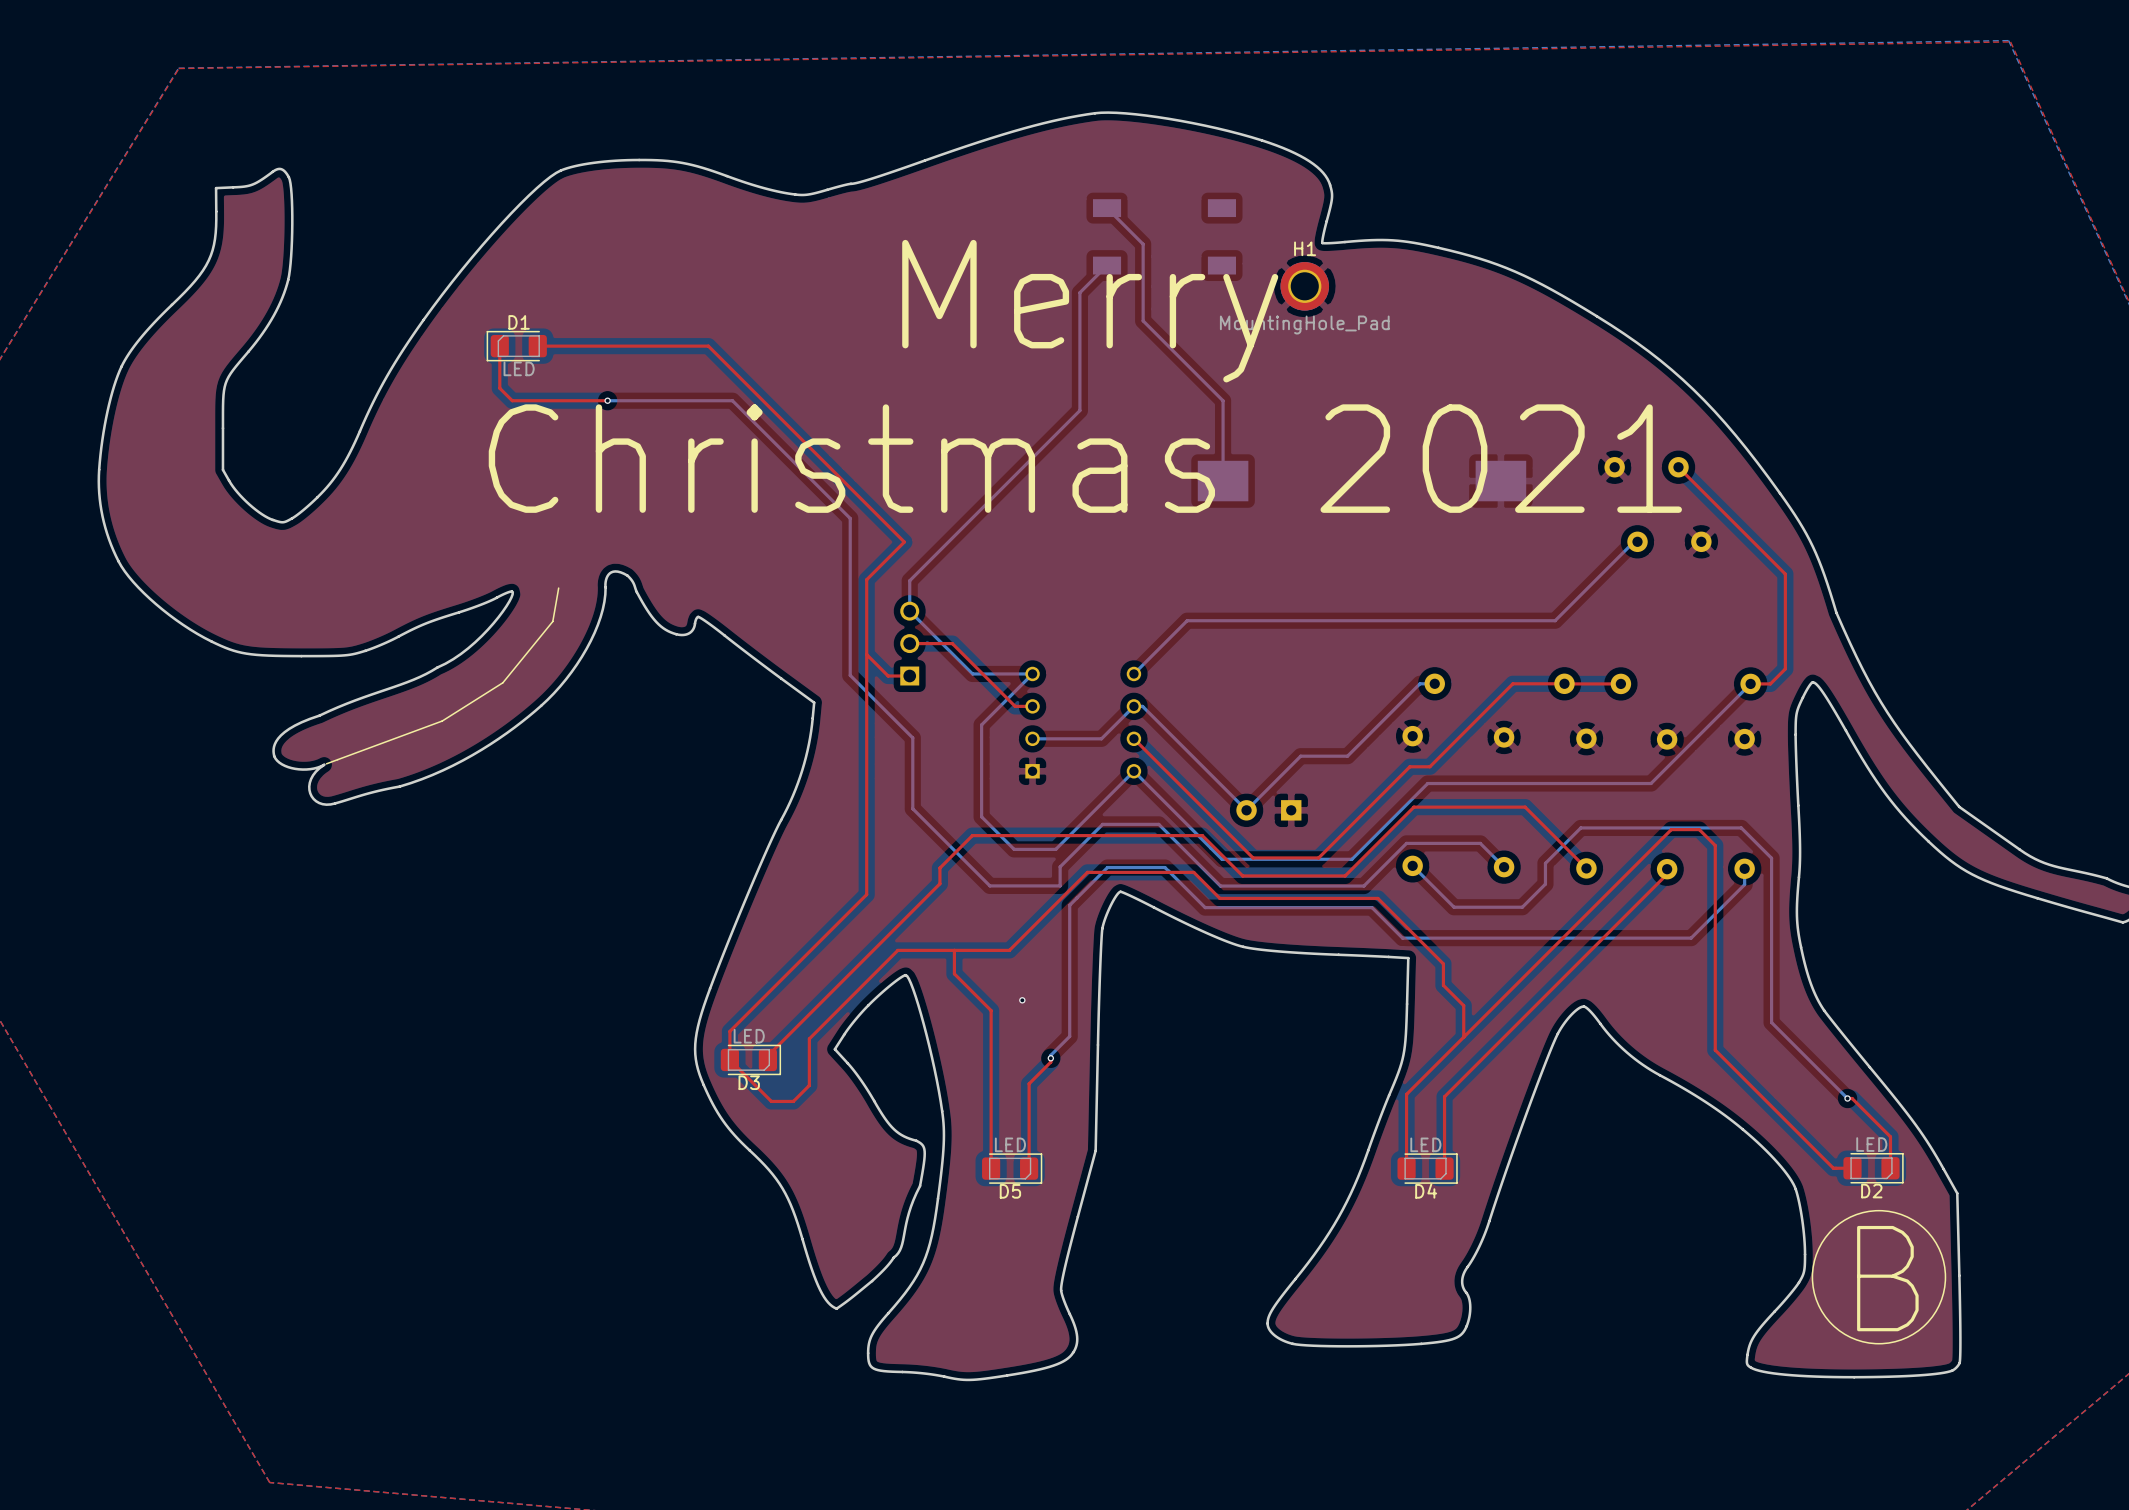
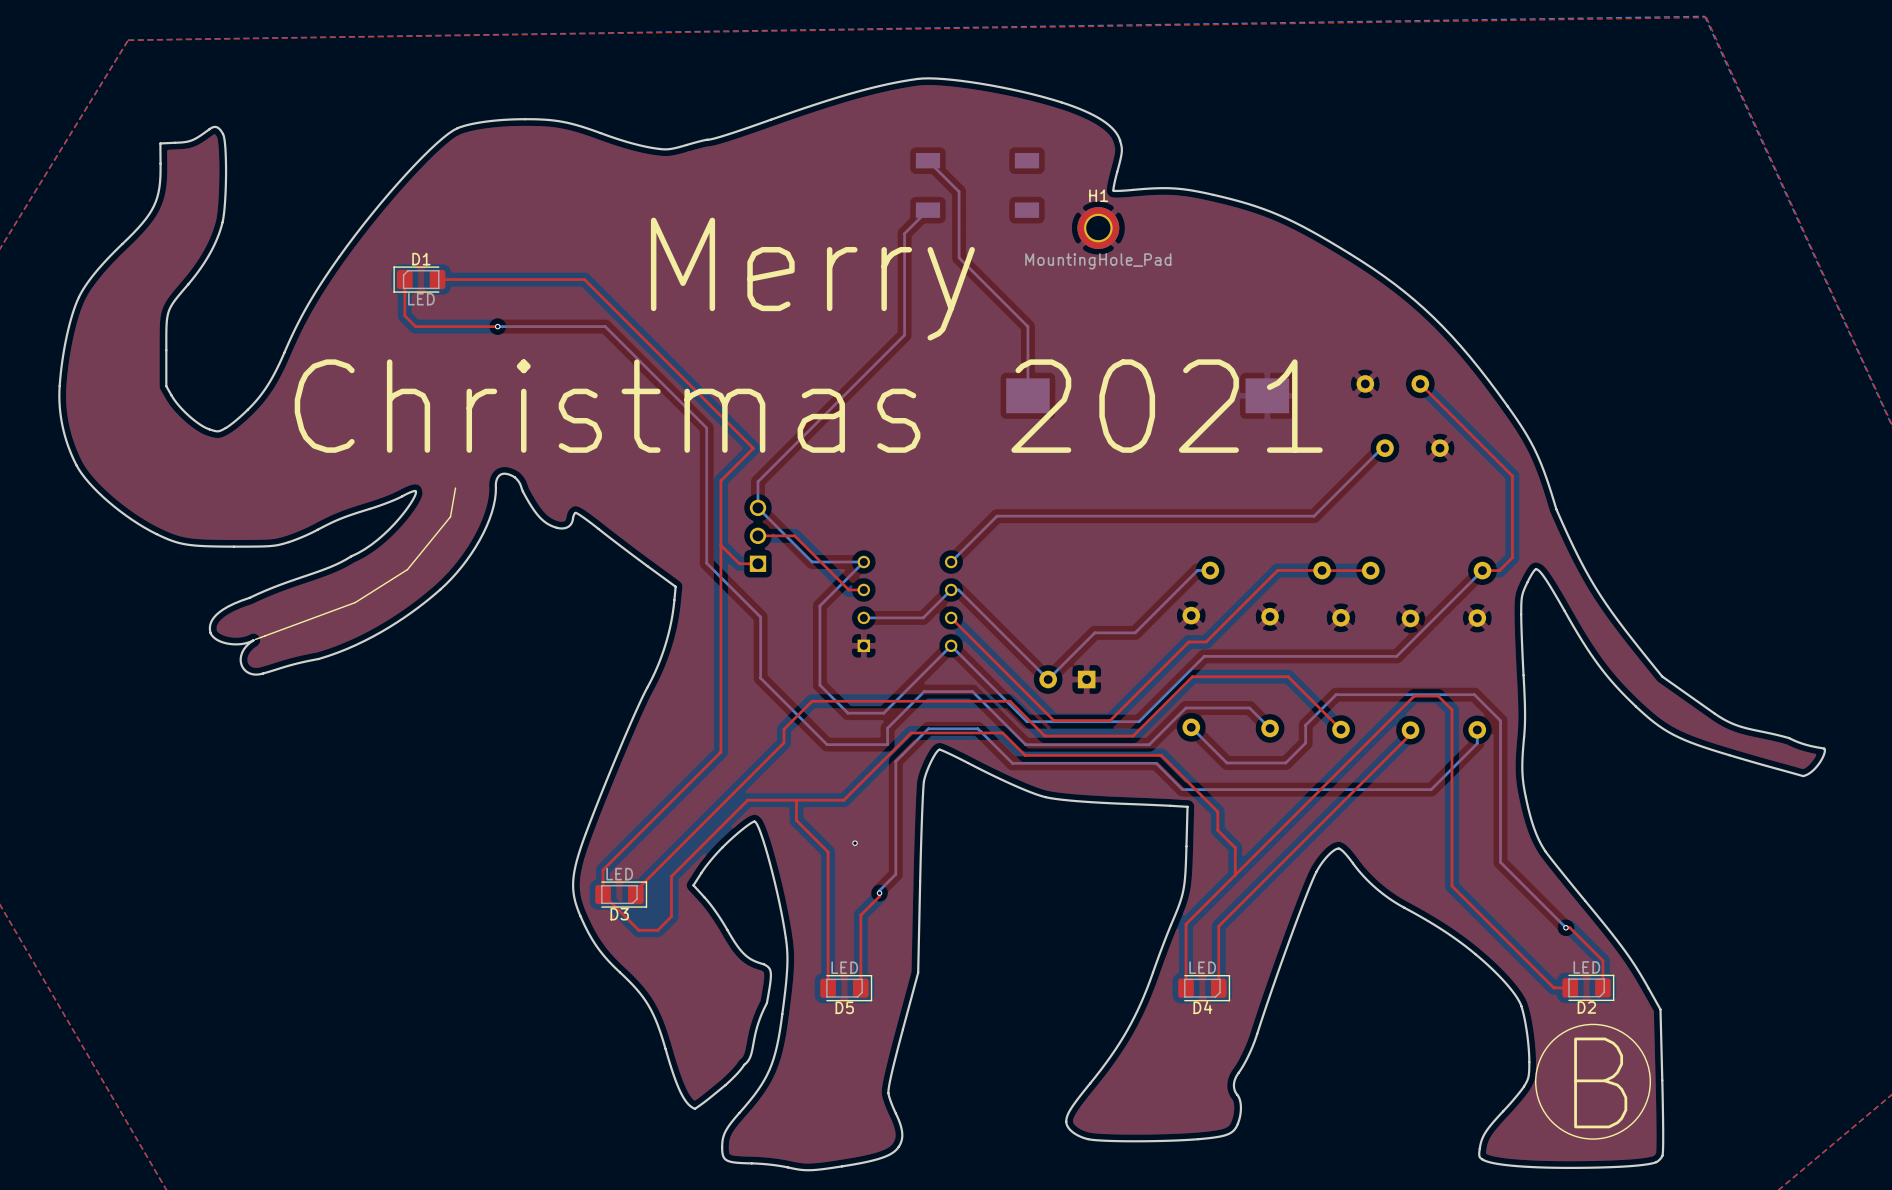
text position: Merry (1090, 311) -> Merry (812, 279)
text position: Christmas 2021 (1085, 458) -> Christmas 2021 (808, 406)

